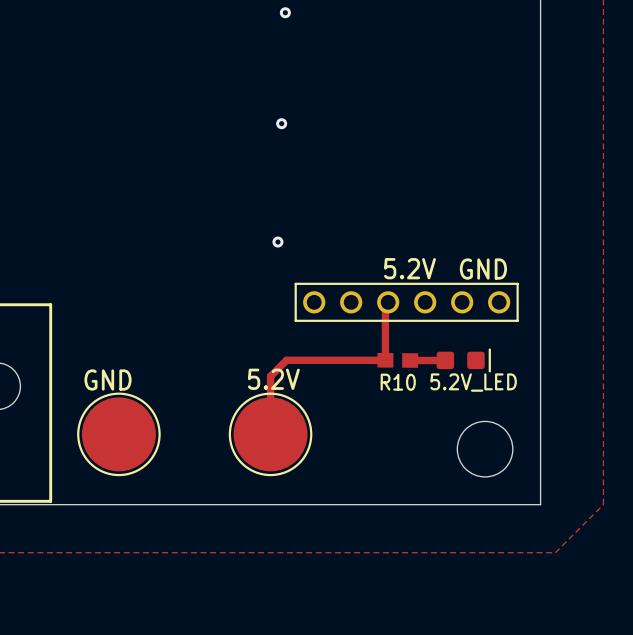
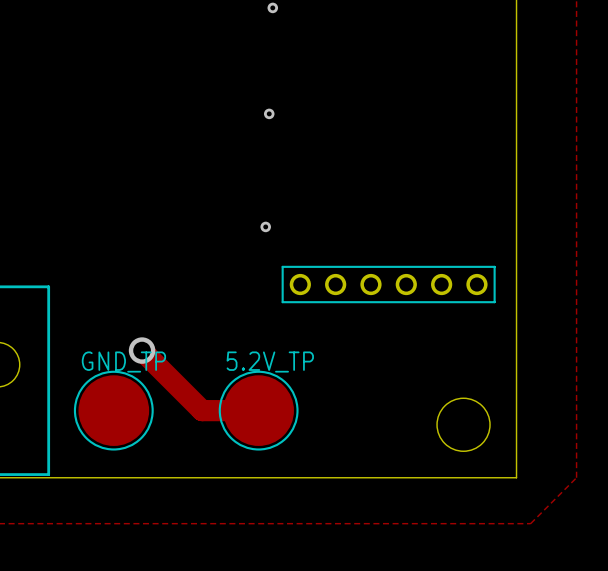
text: 5.2V (409, 268) -> none
text: GND (483, 269) -> none
track: (388, 302) (385, 305) (385, 360) (286, 360) (270, 376) (270, 434) -> (142, 350) (202, 410) (258, 410)
R10: (397, 360) -> none
track: (410, 360) (445, 360) -> none
5.2V_LED: (463, 360) -> none
via: none -> (142, 350)
5.2V name: 5.2V (273, 379) -> 5.2V_TP (270, 362)
GND name: GND (108, 380) -> GND_TP (123, 362)

